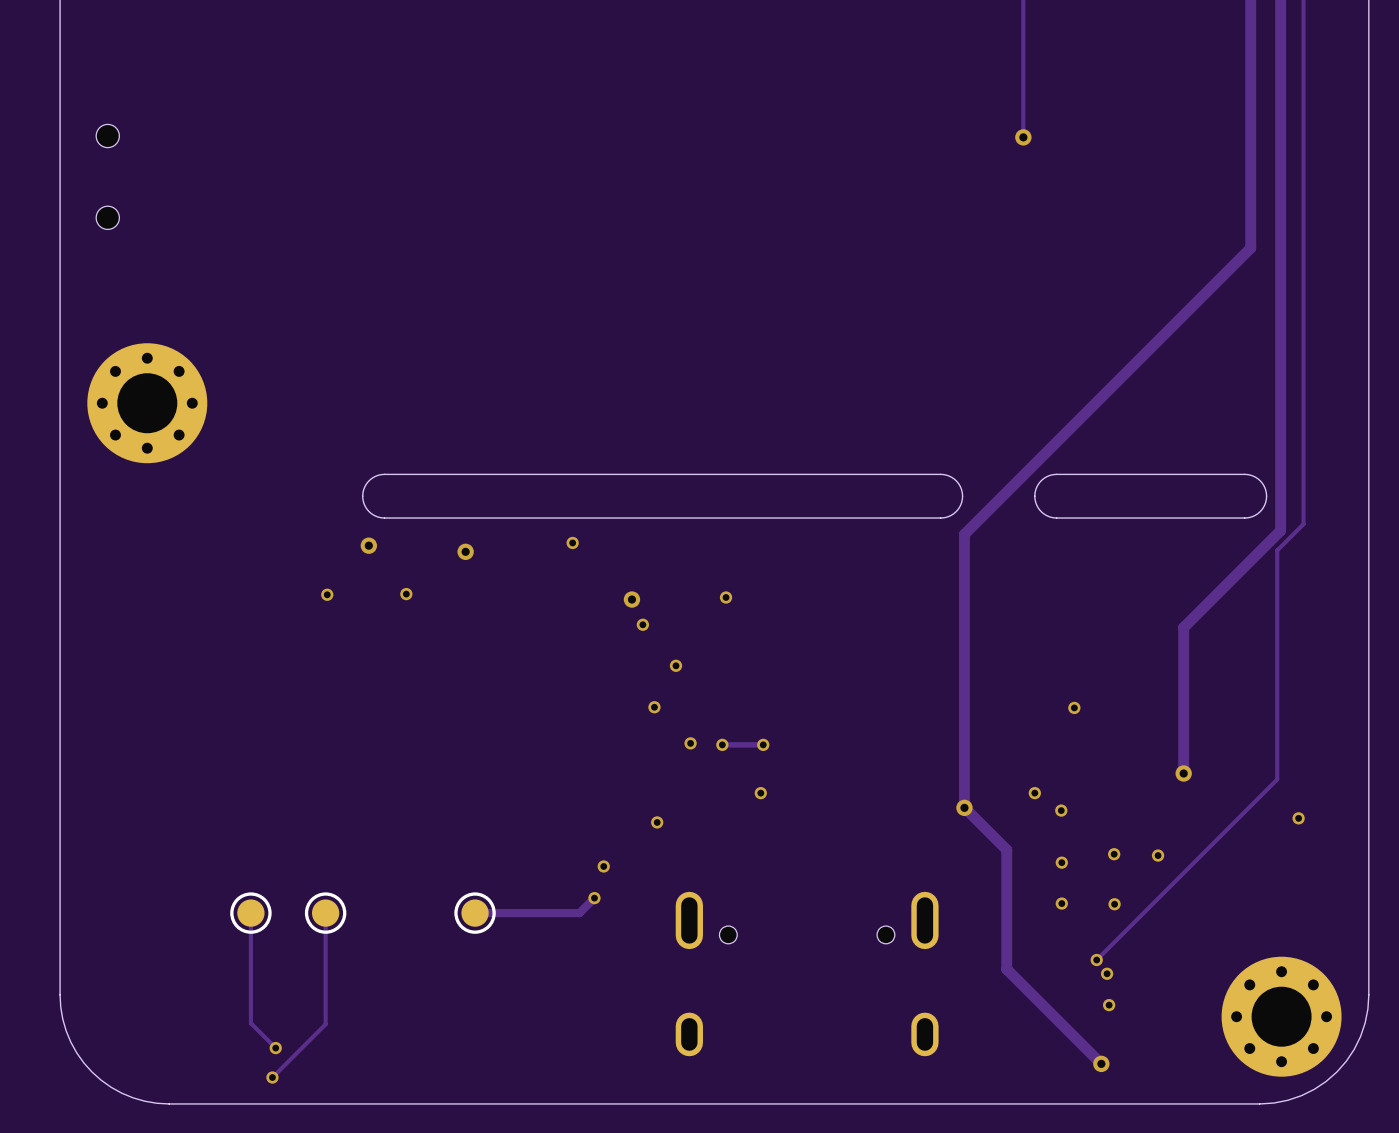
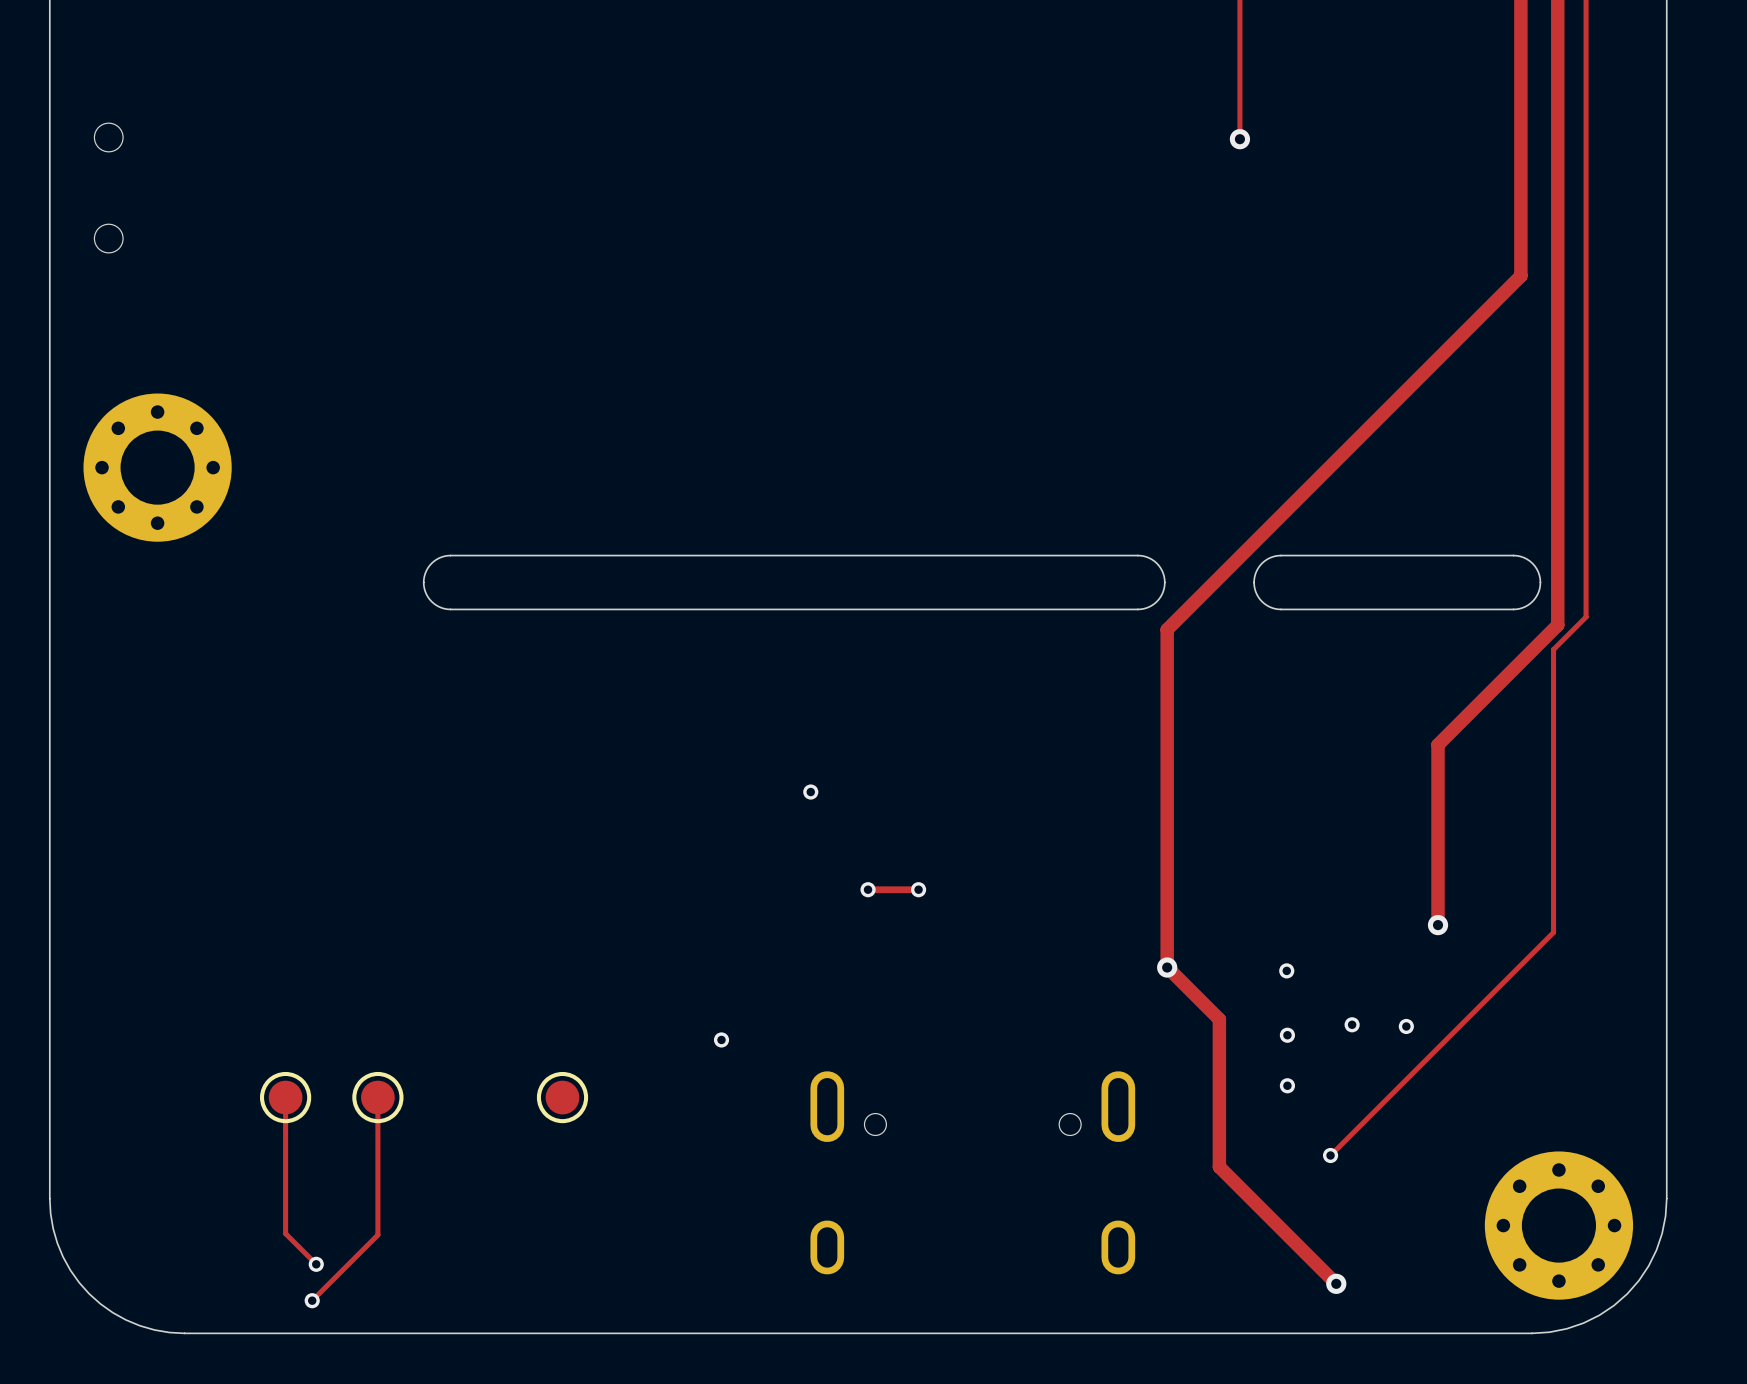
via: (572, 542) -> none
via: (368, 545) -> none
via: (465, 551) -> none
via: (327, 594) -> none
via: (406, 594) -> none
via: (726, 597) -> none
via: (631, 599) -> none
via: (642, 624) -> none
via: (654, 707) -> none
via: (1074, 707) -> none
via: (690, 743) -> none
via: (760, 793) -> none
via: (1034, 793) -> none
via: (1298, 818) -> none
via: (657, 822) -> none
track: (594, 898) (579, 913) (475, 913) -> none
via: (594, 898) -> none
via: (1114, 904) -> none
via: (1107, 973) -> none
via: (1109, 1005) -> none

